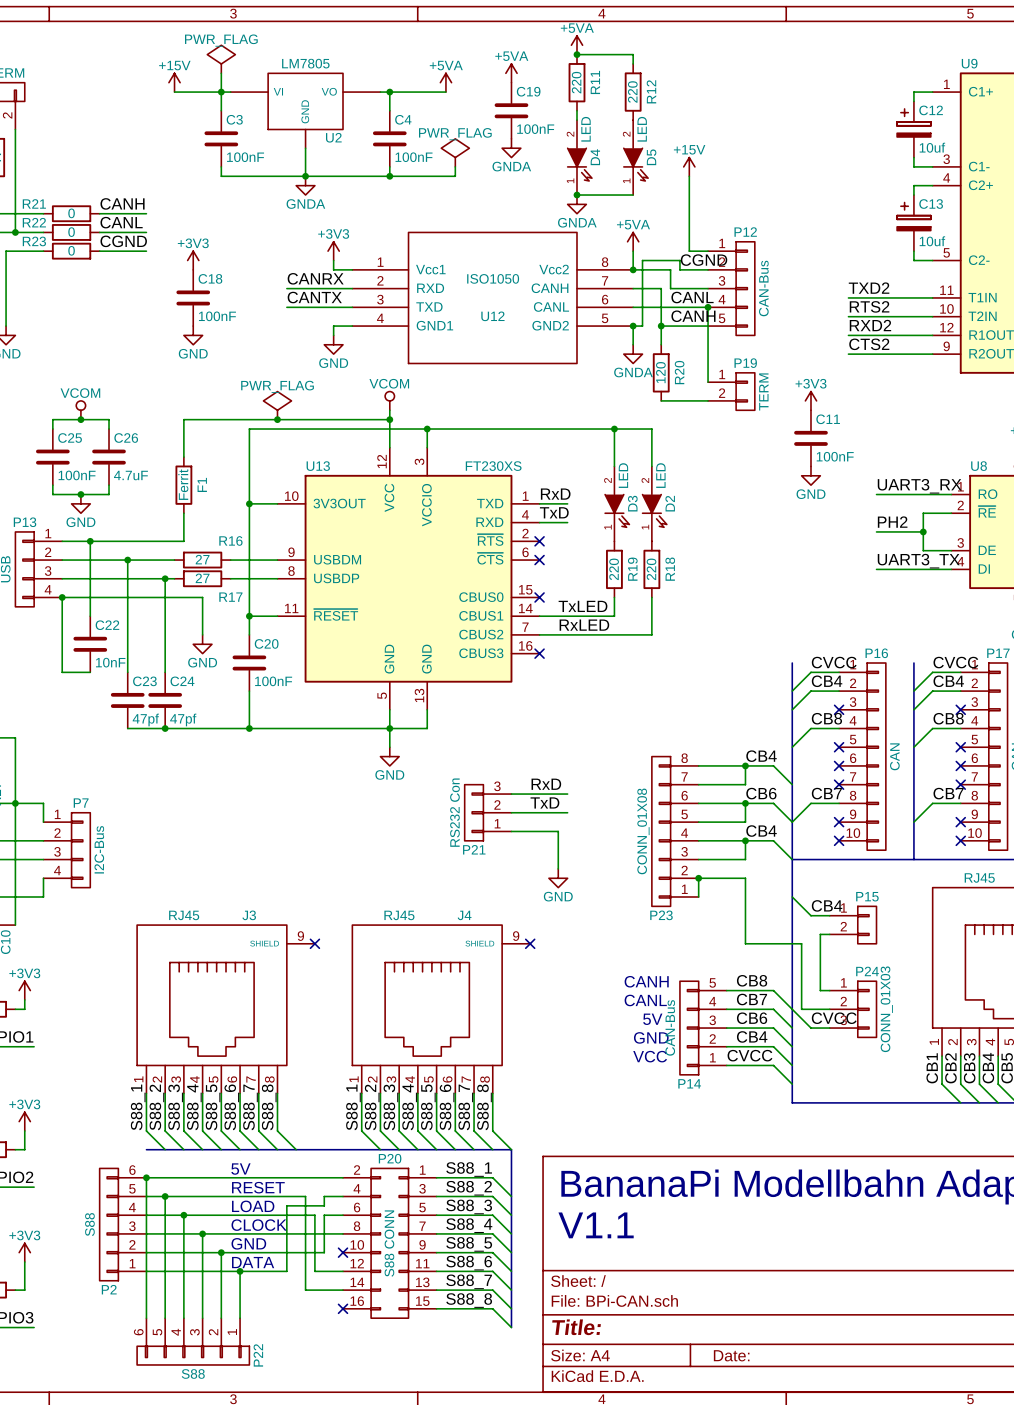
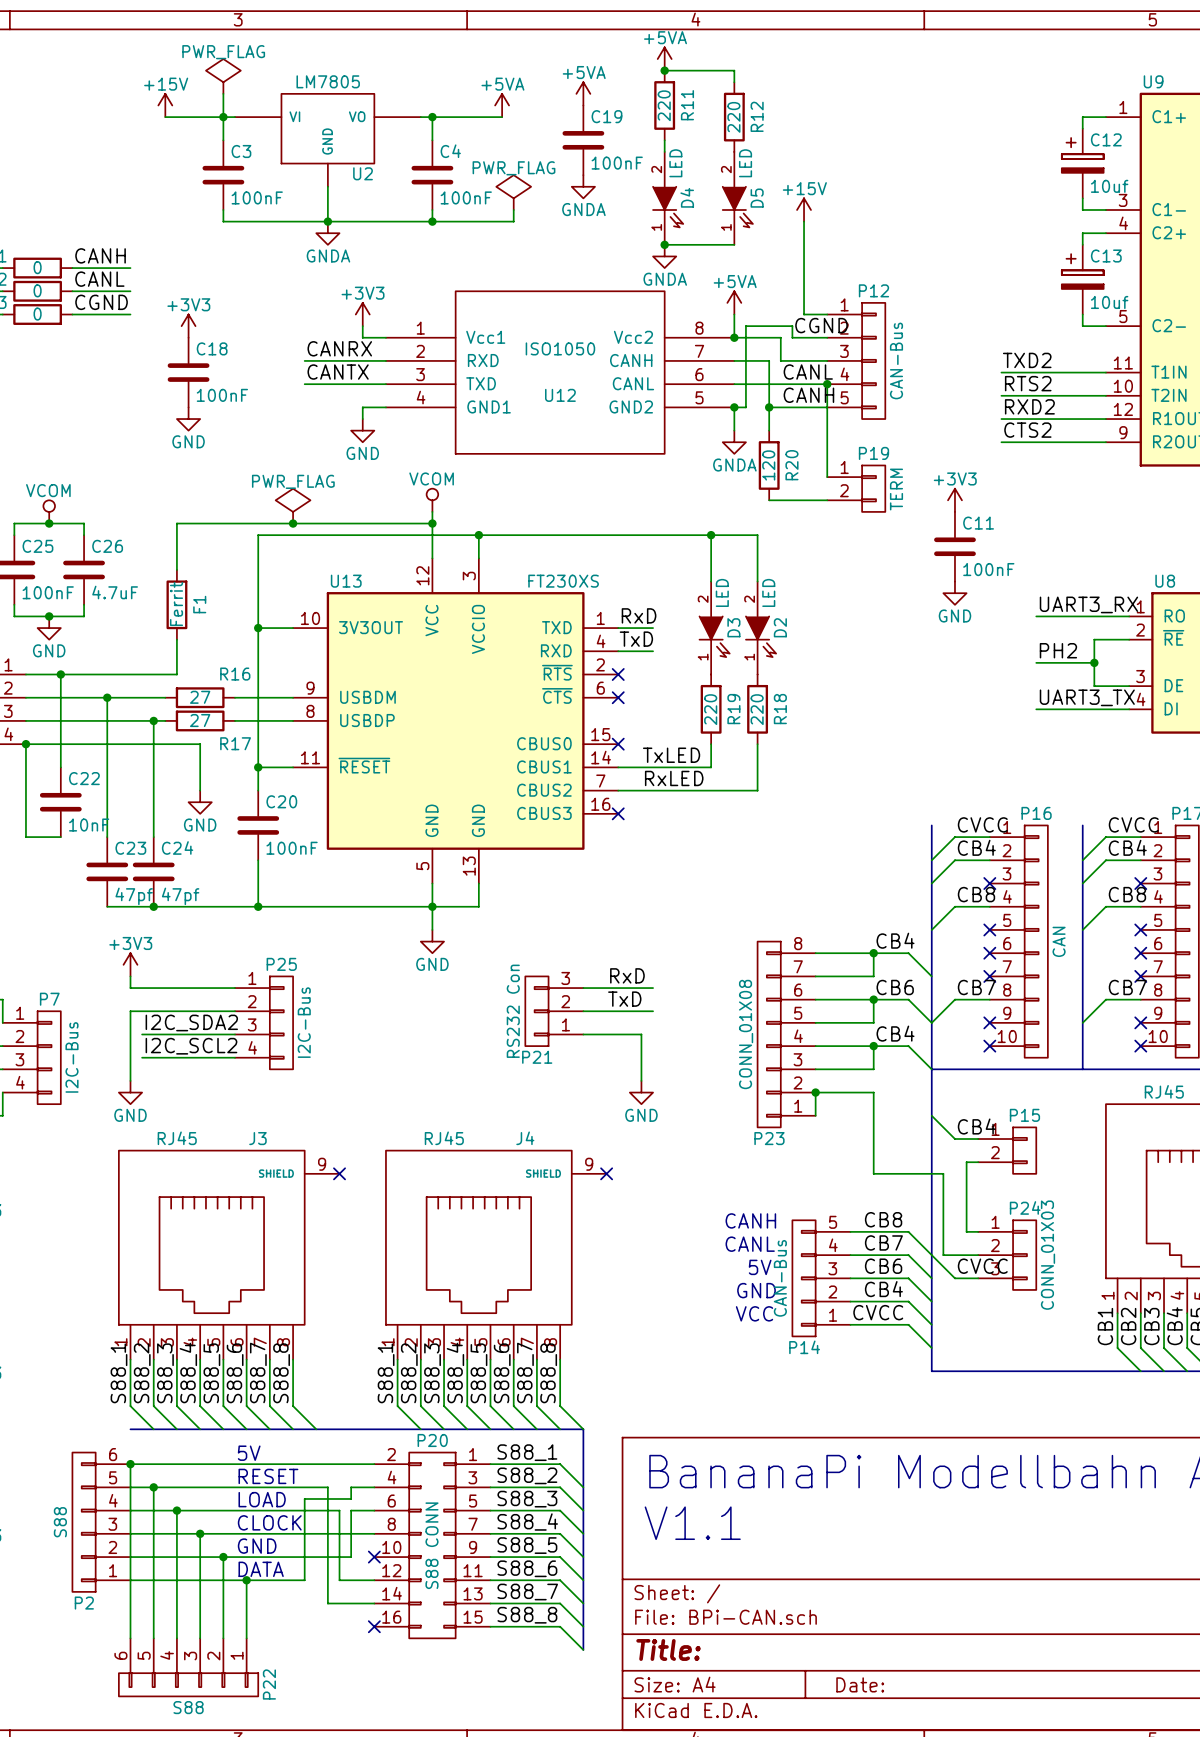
power symbol: none -> +3V3 (130, 964)
wire: none -> (130, 976) (130, 988) (235, 988)
wire: none -> (235, 1011) (130, 1011) (130, 1080)
P25: none -> I2C-Bus (264, 1022)
label: none -> I2C_SDA2 (191, 1022)
wire: none -> (142, 1034) (235, 1034)
label: none -> I2C_SCL2 (191, 1046)
wire: none -> (142, 1057) (235, 1057)
power symbol: none -> GND (130, 1092)

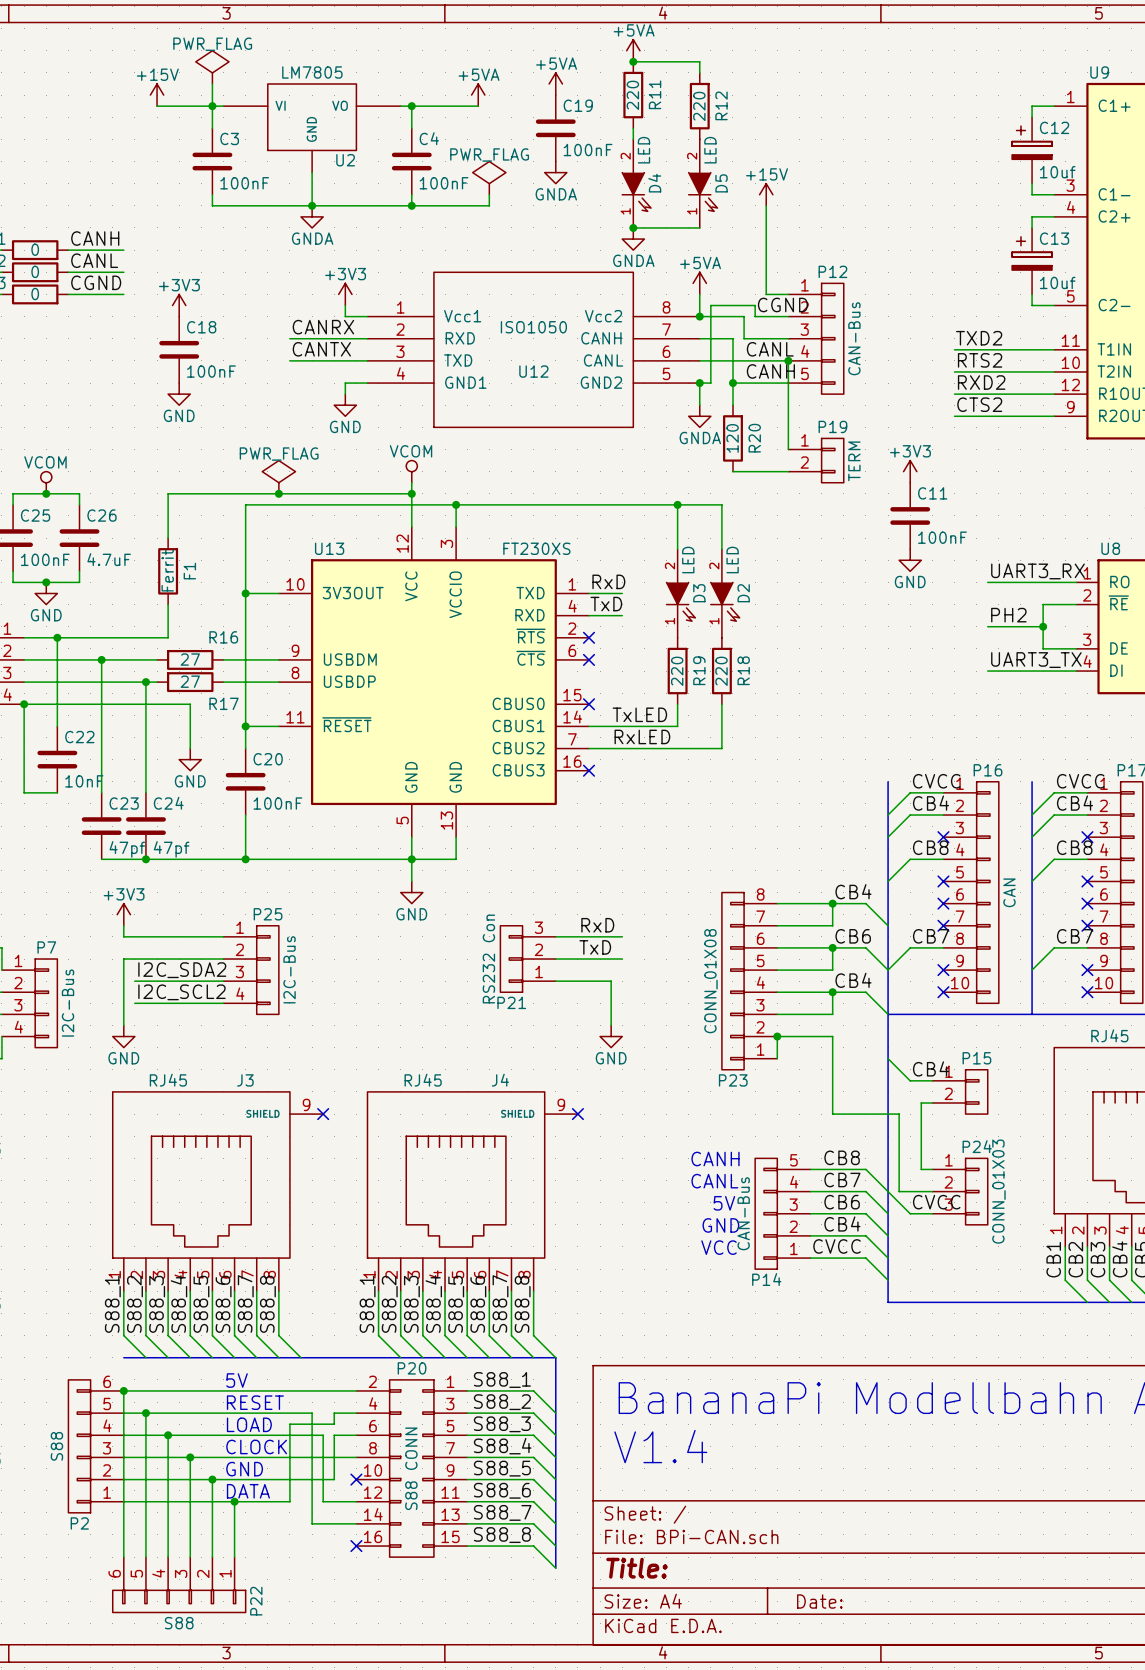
text: V1.1 (692, 1523) -> V1.4 (660, 1446)

